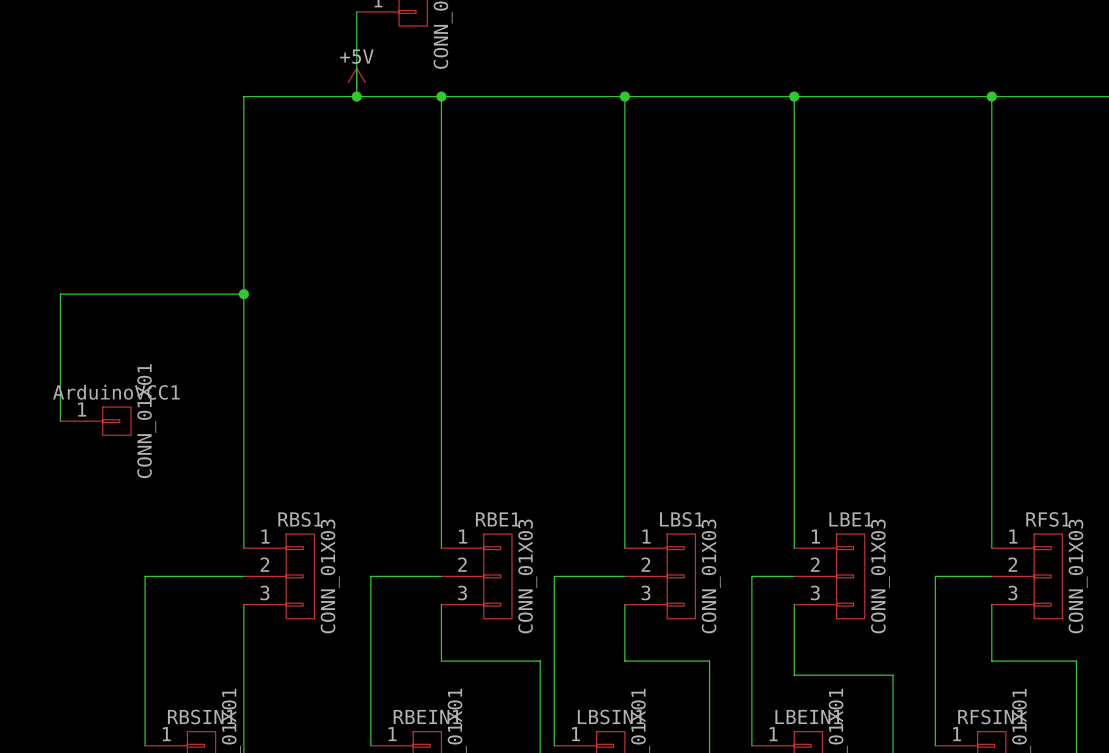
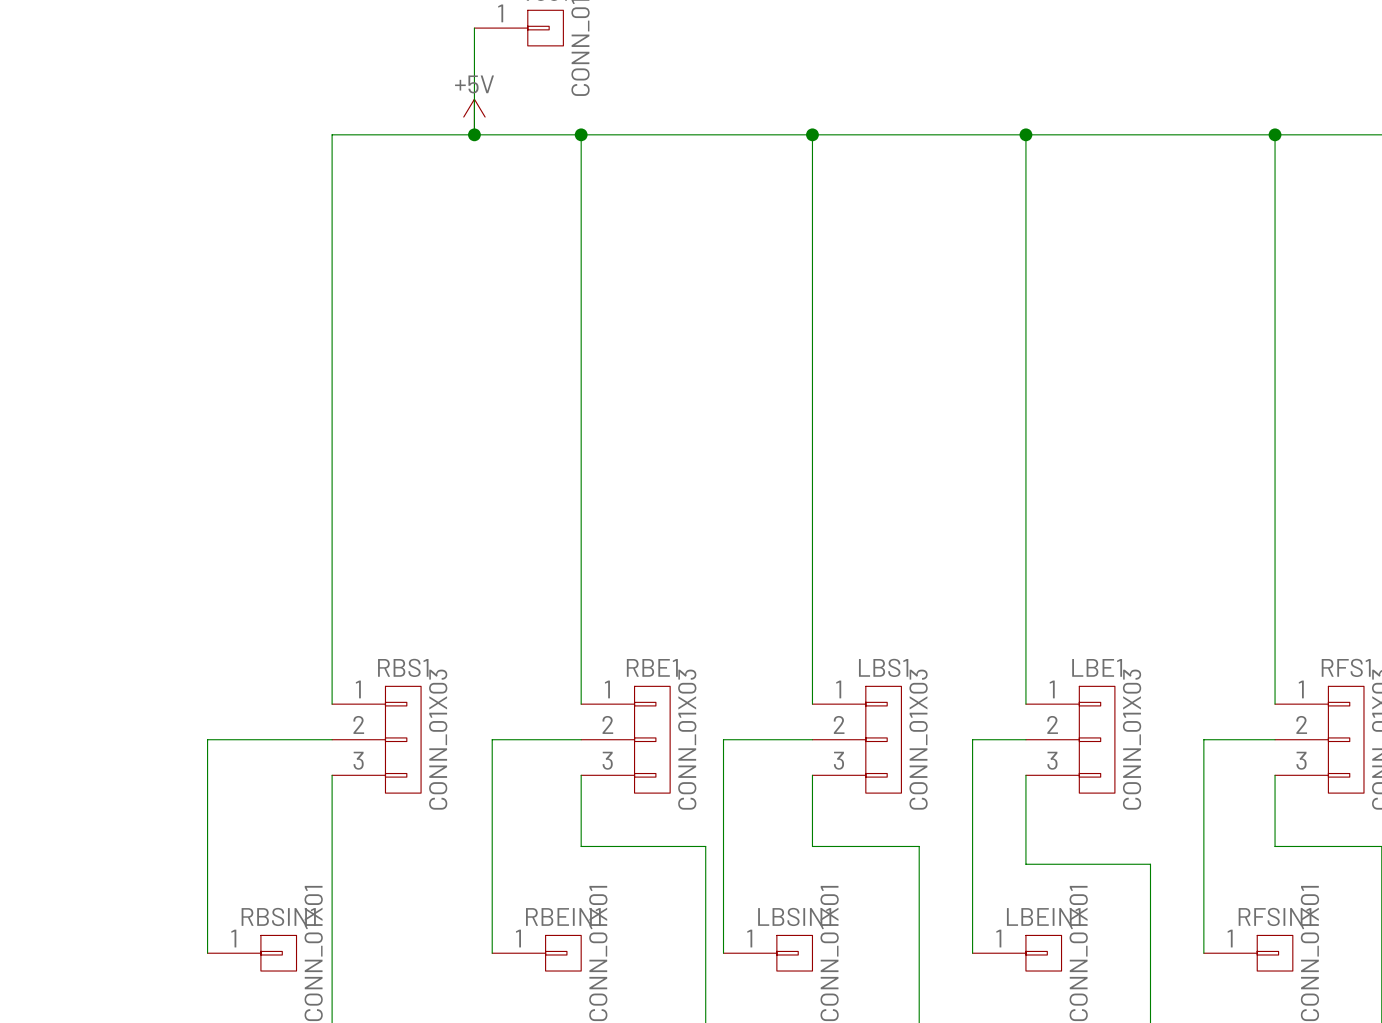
wire: (243, 294) (60, 294) (60, 421) -> none
junction: (243, 294) -> none
ArduinoVCC1: CONN_01X01 (95, 421) -> none

